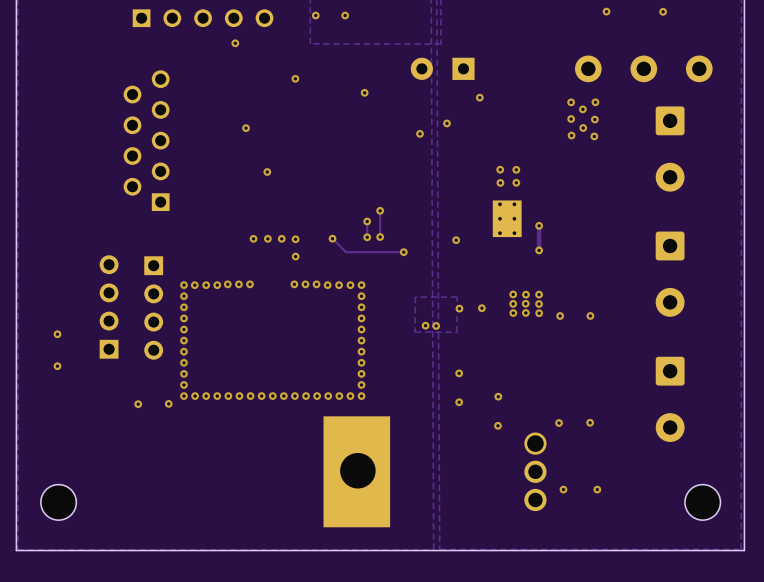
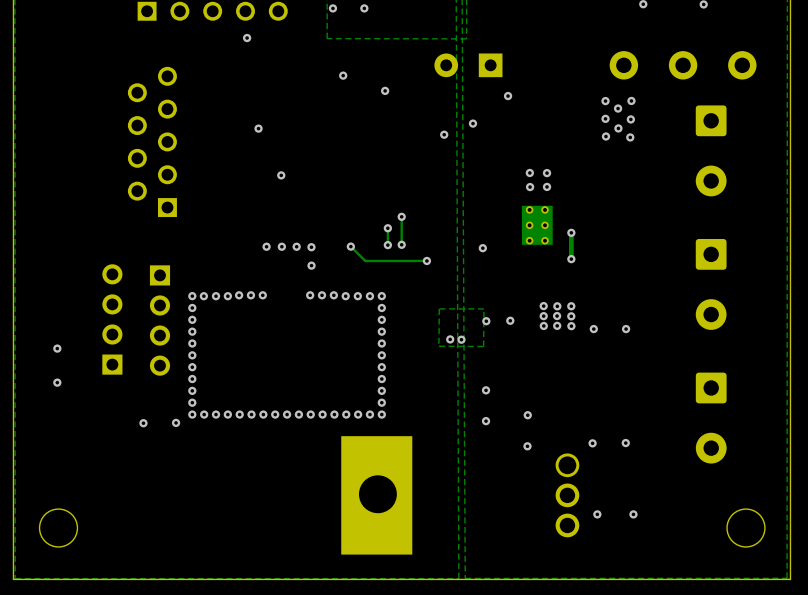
via position: (295, 78) -> (343, 75)

